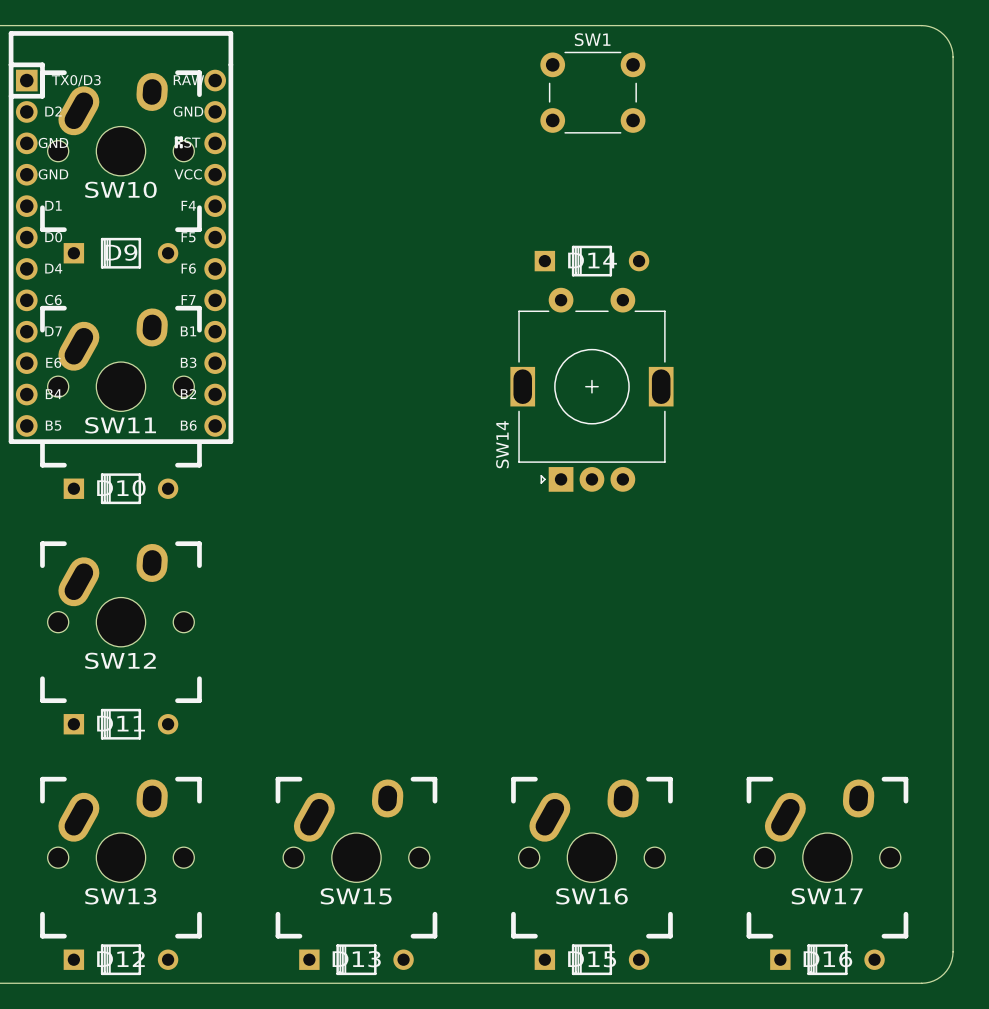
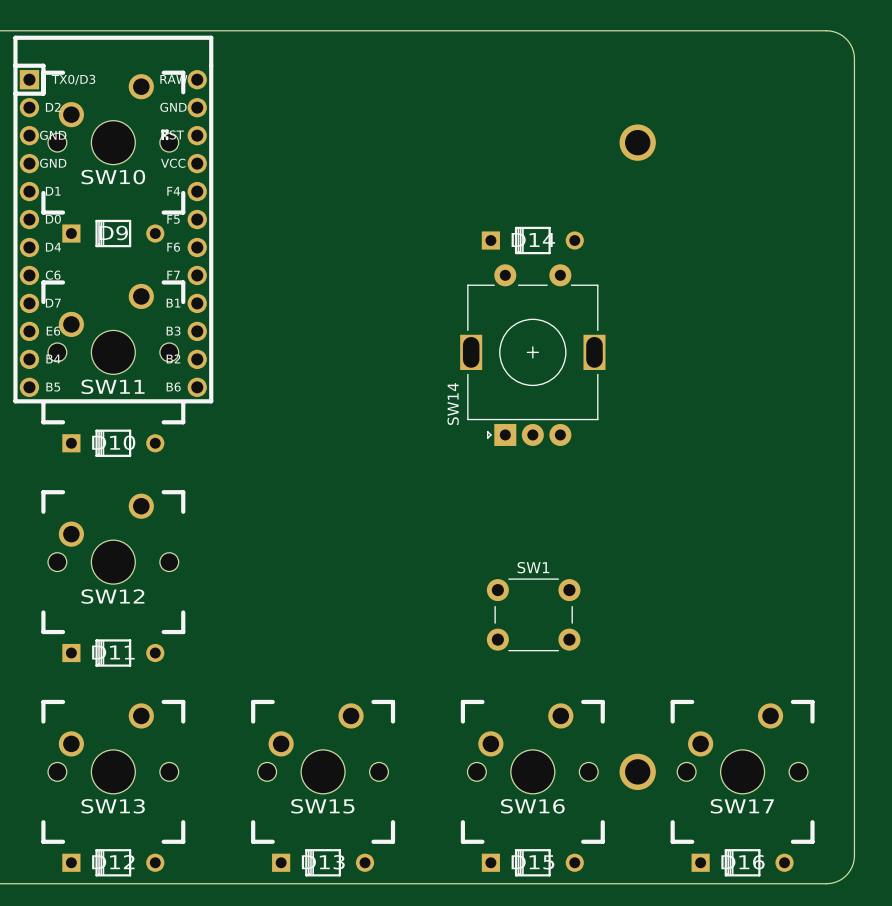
SW10 footprint: [40, 70, 202, 233] -> [41, 70, 186, 215]
SW1 position: (592, 92) -> (533, 614)
part: none -> (637, 142)
SW11 footprint: [40, 305, 202, 468] -> [41, 280, 186, 425]
SW12 footprint: [40, 541, 202, 704] -> [41, 490, 186, 635]
SW13 footprint: [40, 776, 202, 939] -> [41, 699, 186, 844]
SW15 footprint: [275, 776, 438, 939] -> [251, 699, 396, 844]
SW16 footprint: [511, 776, 673, 939] -> [460, 699, 605, 844]
SW17 footprint: [746, 776, 909, 939] -> [670, 699, 815, 844]
part: none -> (637, 771)

